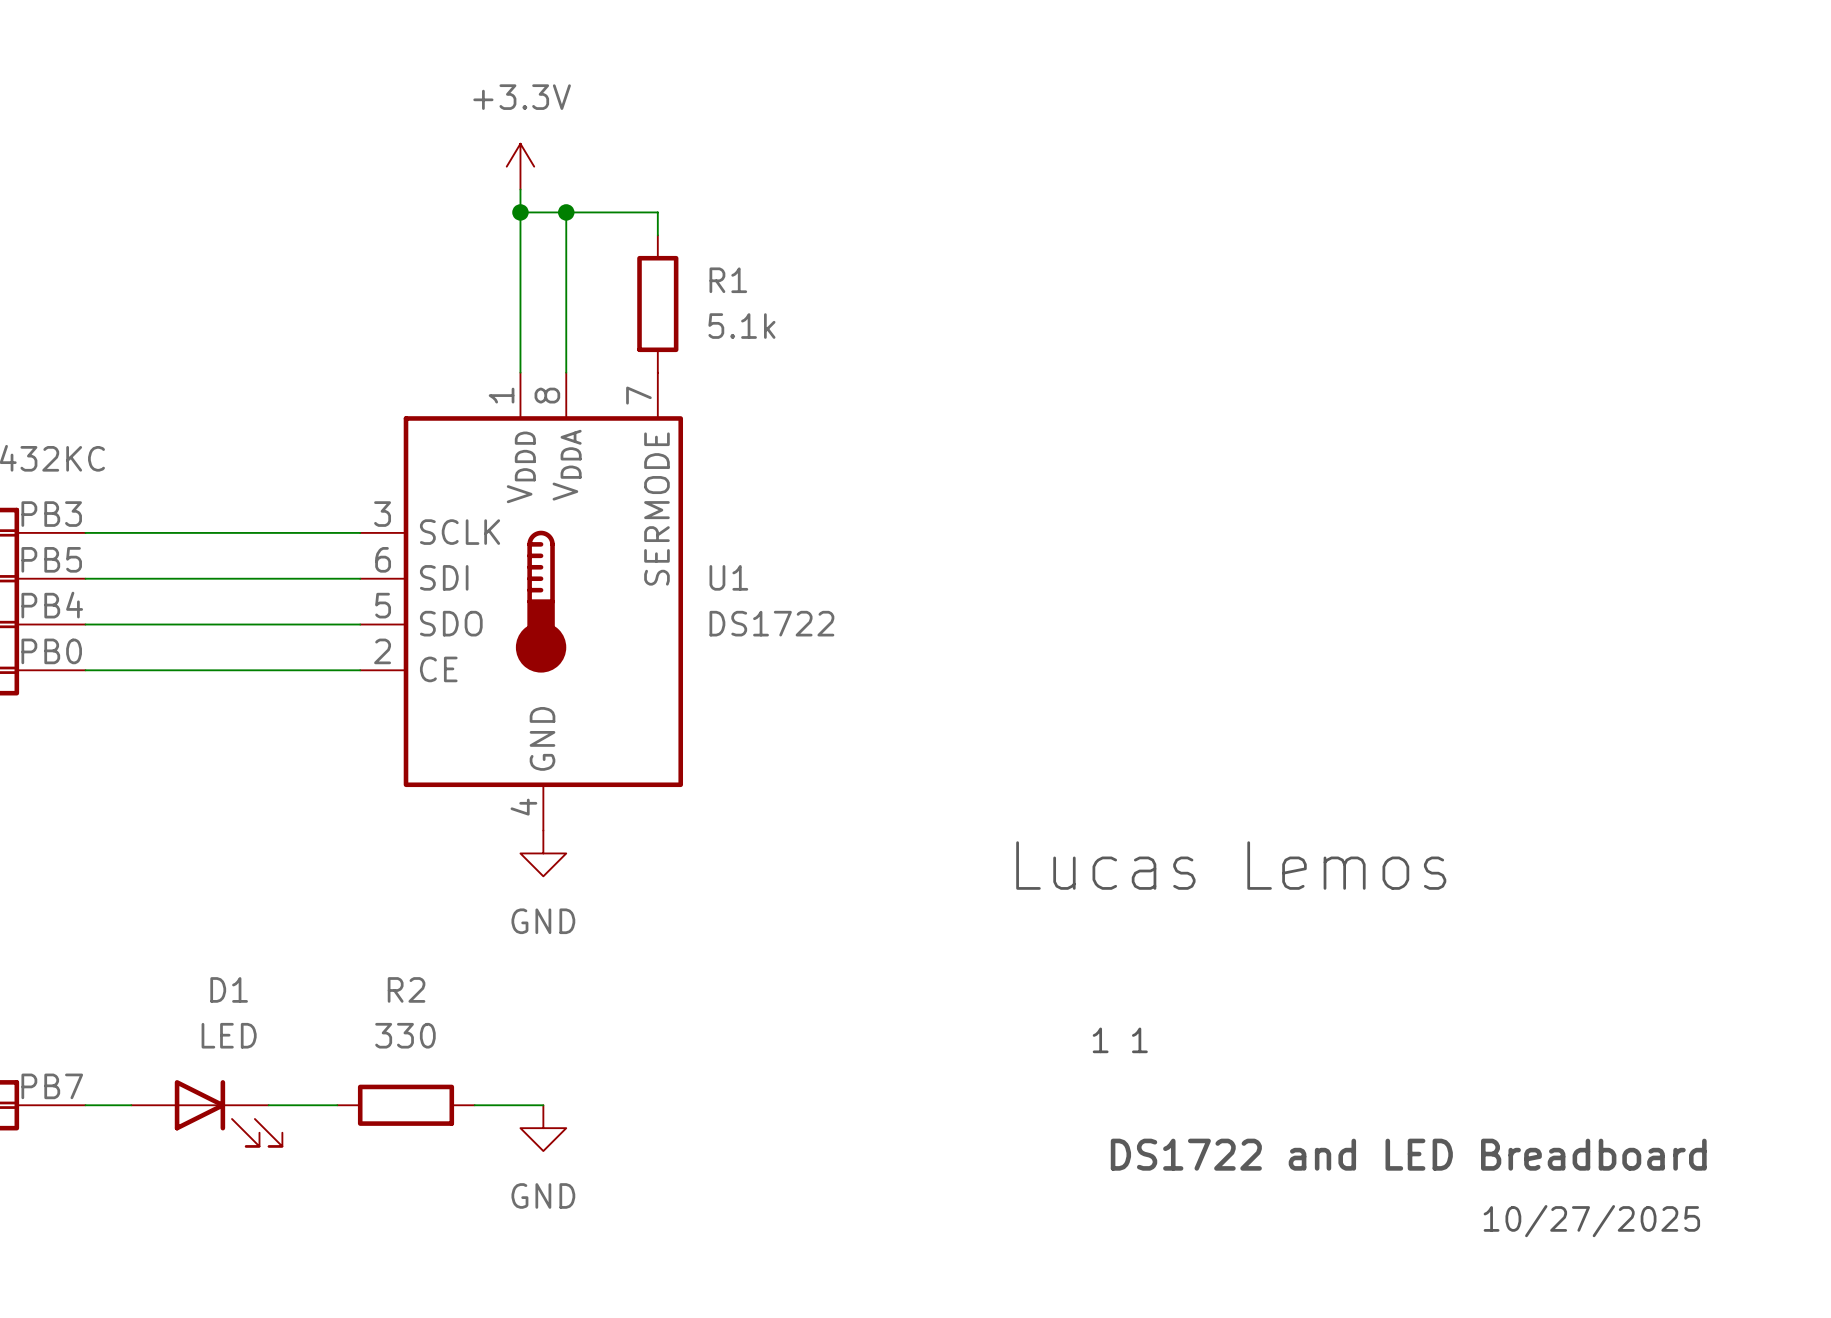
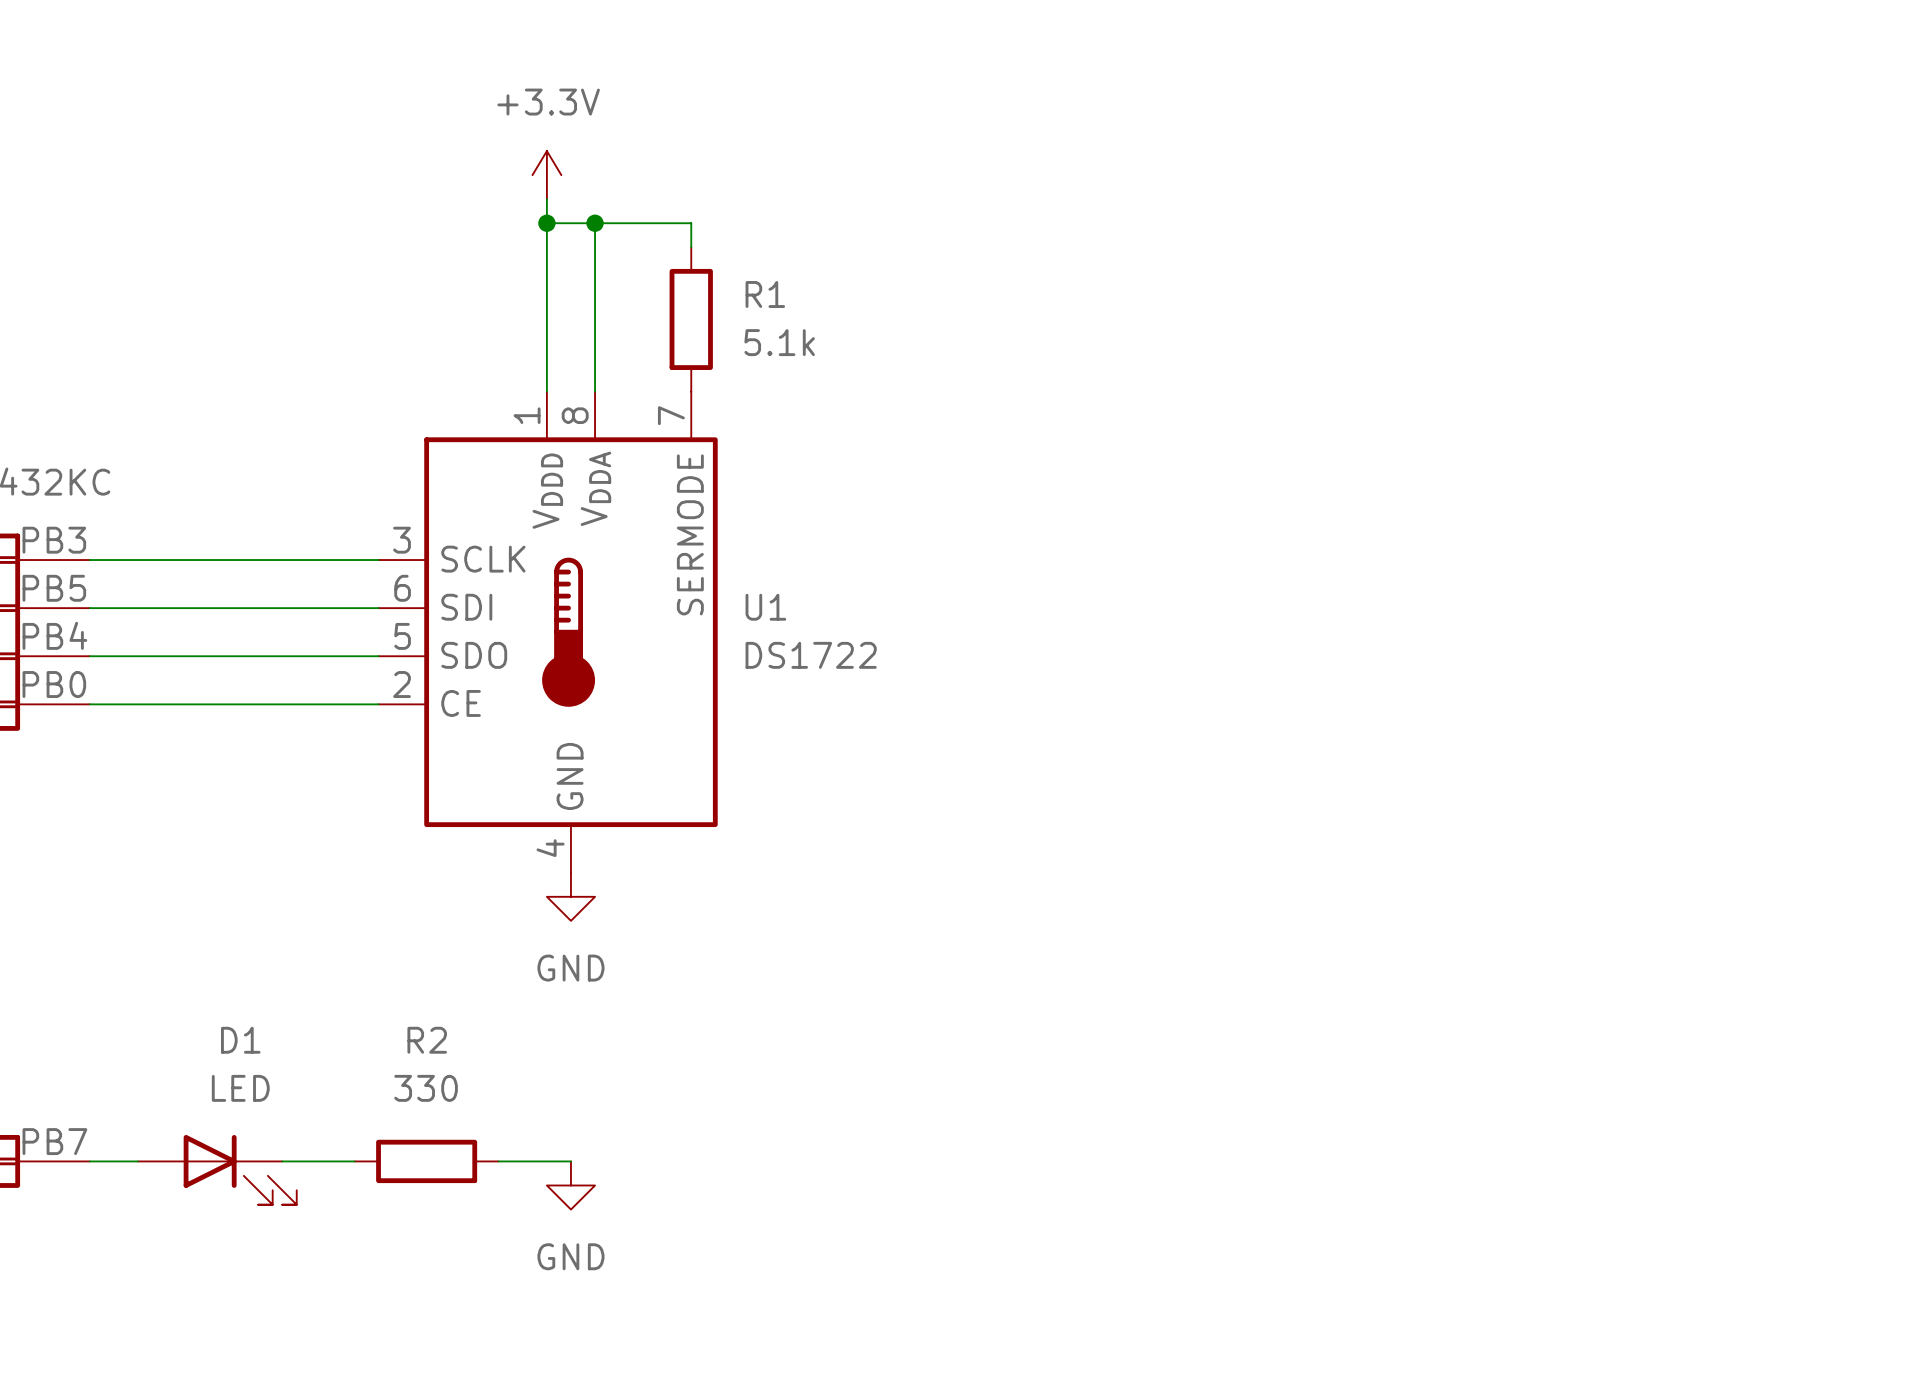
text: Lucas Lemos (1231, 865) -> none
text: 1 1 (1120, 1040) -> none
text: DS1722 and LED Breadboard (1408, 1154) -> none
text: 10/27/2025 (1591, 1221) -> none

